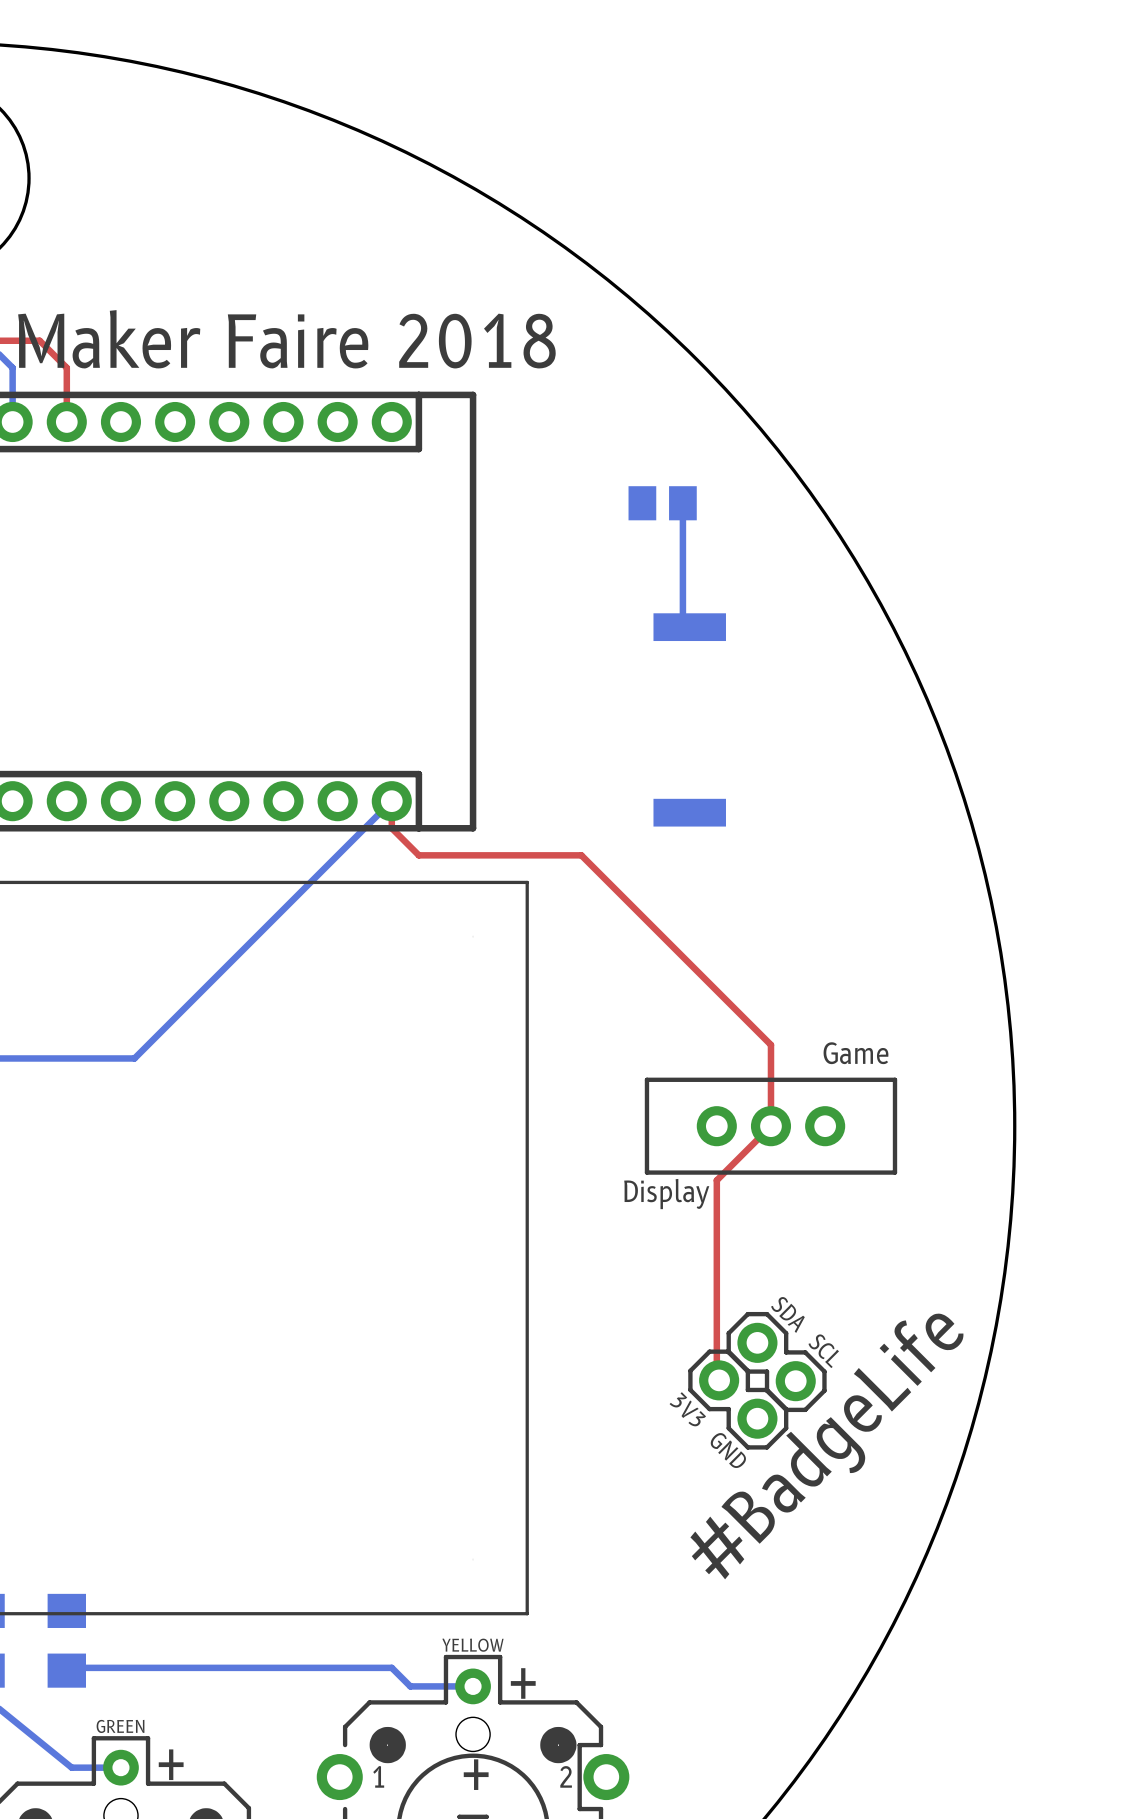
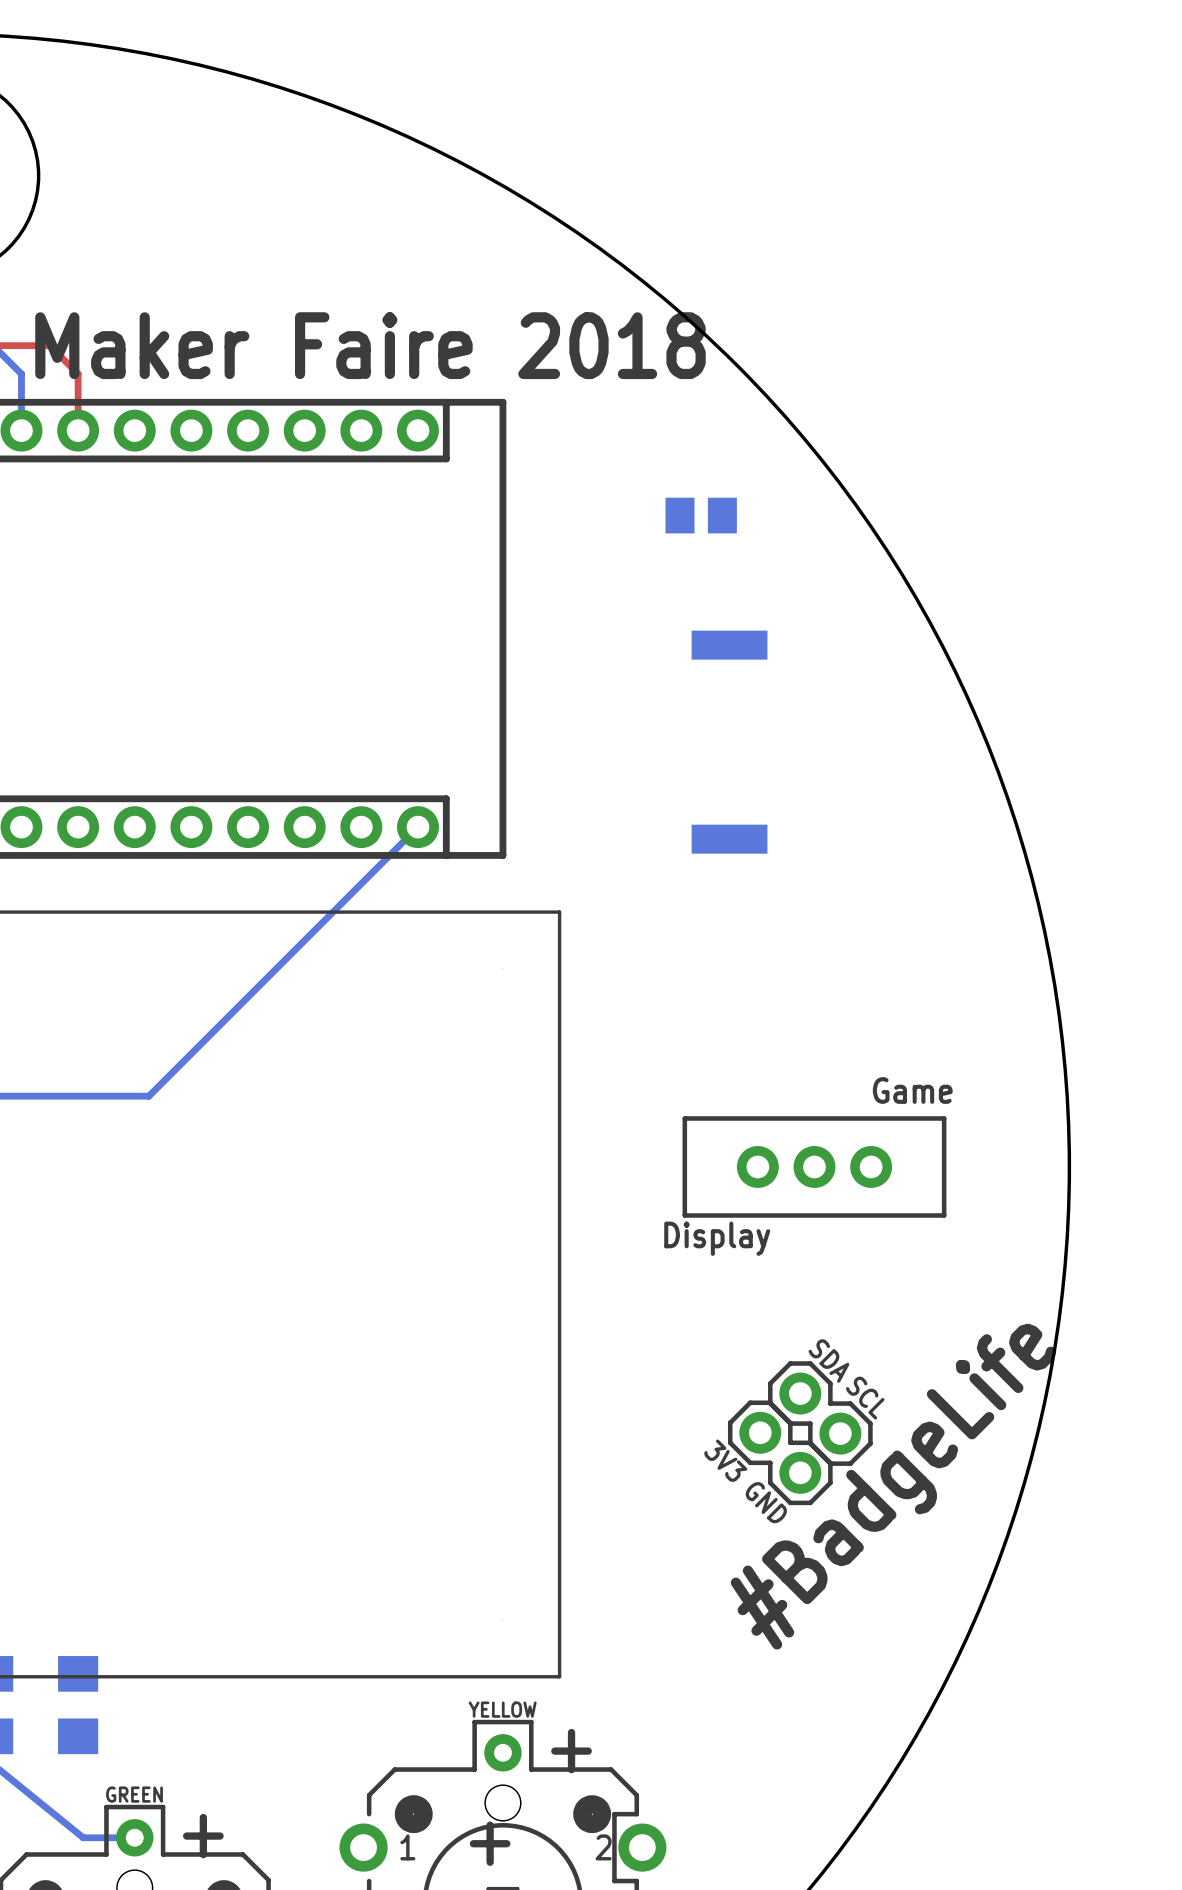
bottom track: (682, 503) (682, 620) (689, 627) -> none
top track: (391, 801) (391, 828) (418, 855) (581, 855) (770, 1044) (770, 1126) (716, 1180) (716, 1378) (719, 1380) -> none
bottom track: (66, 1670) (69, 1667) (391, 1667) (410, 1686) (473, 1686) -> none

